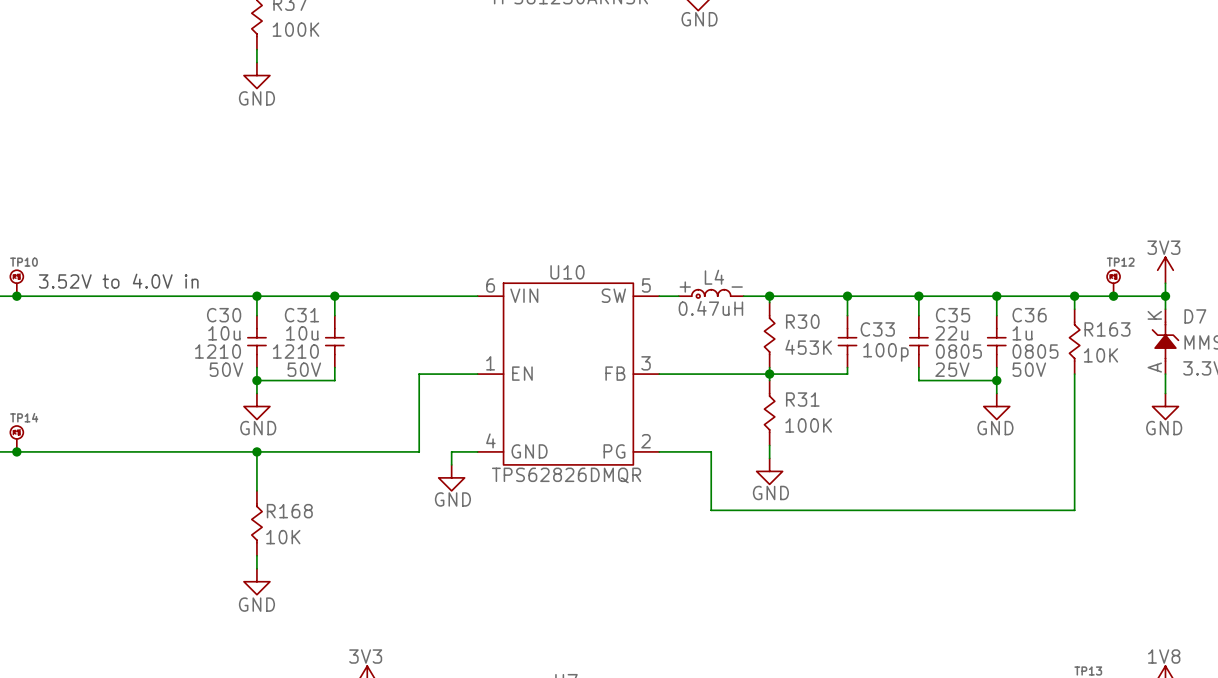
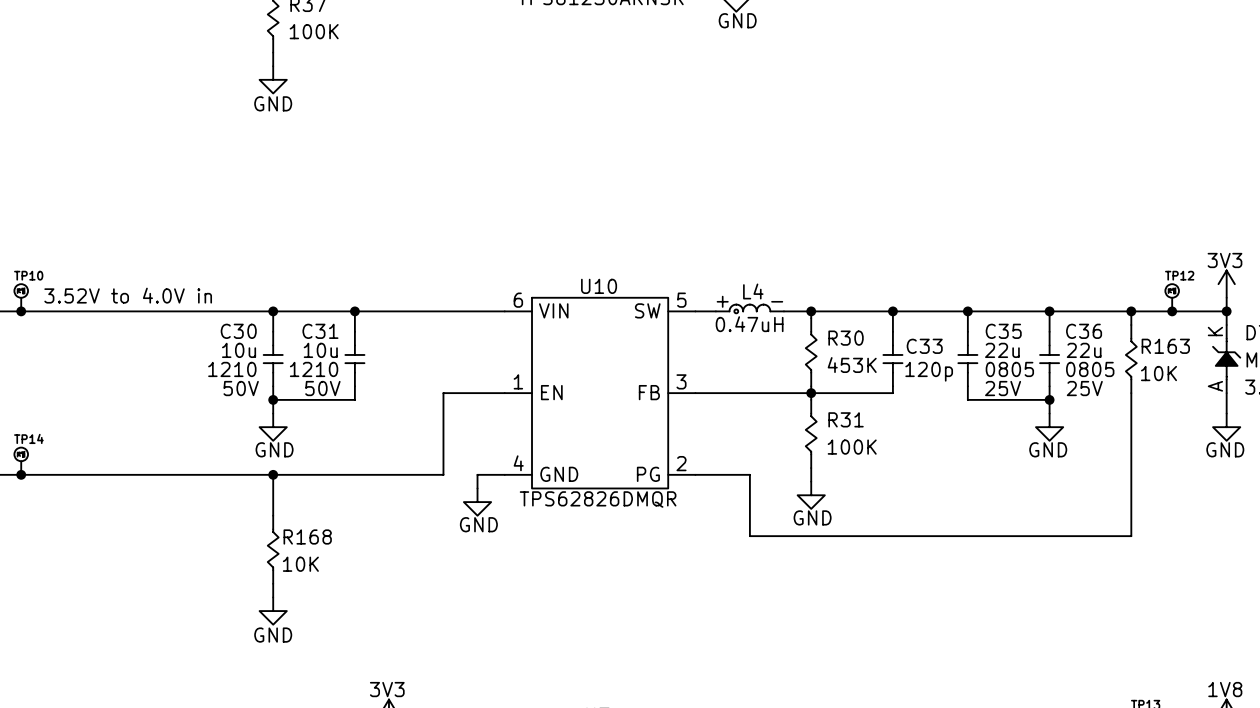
C36 value: 1u (1022, 333) -> 22u (1084, 350)
C33 value: 100p (885, 352) -> 120p (929, 371)
C36 text: 50V (1029, 369) -> 25V (1084, 388)

